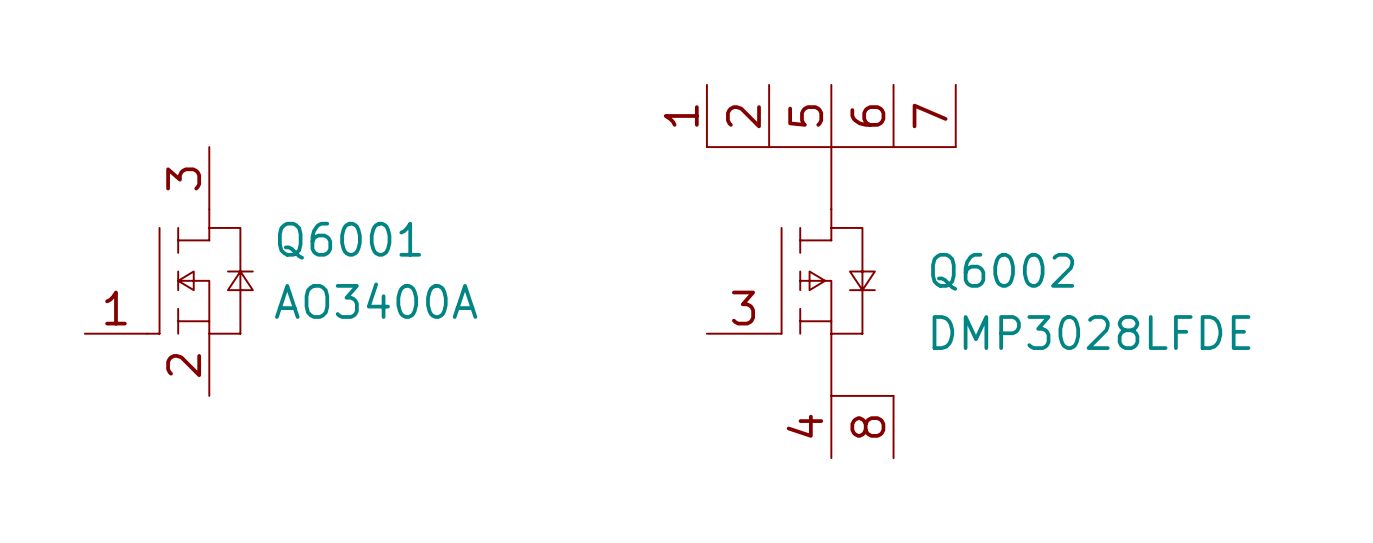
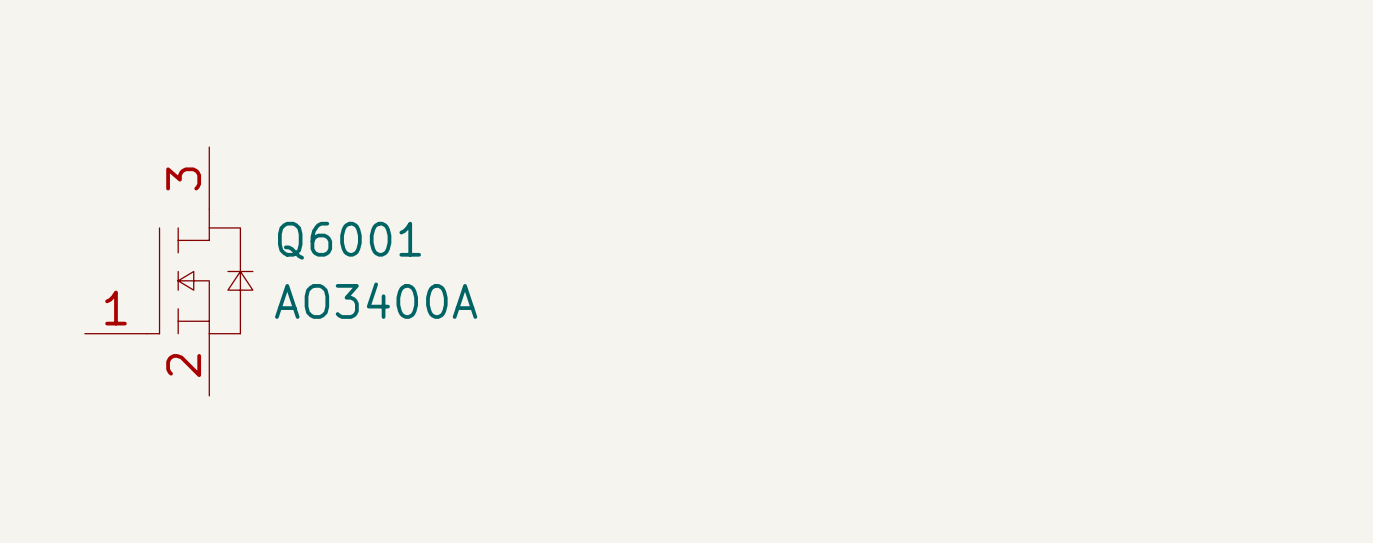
Q6002: DMP3028LFDE (831, 271) -> none

